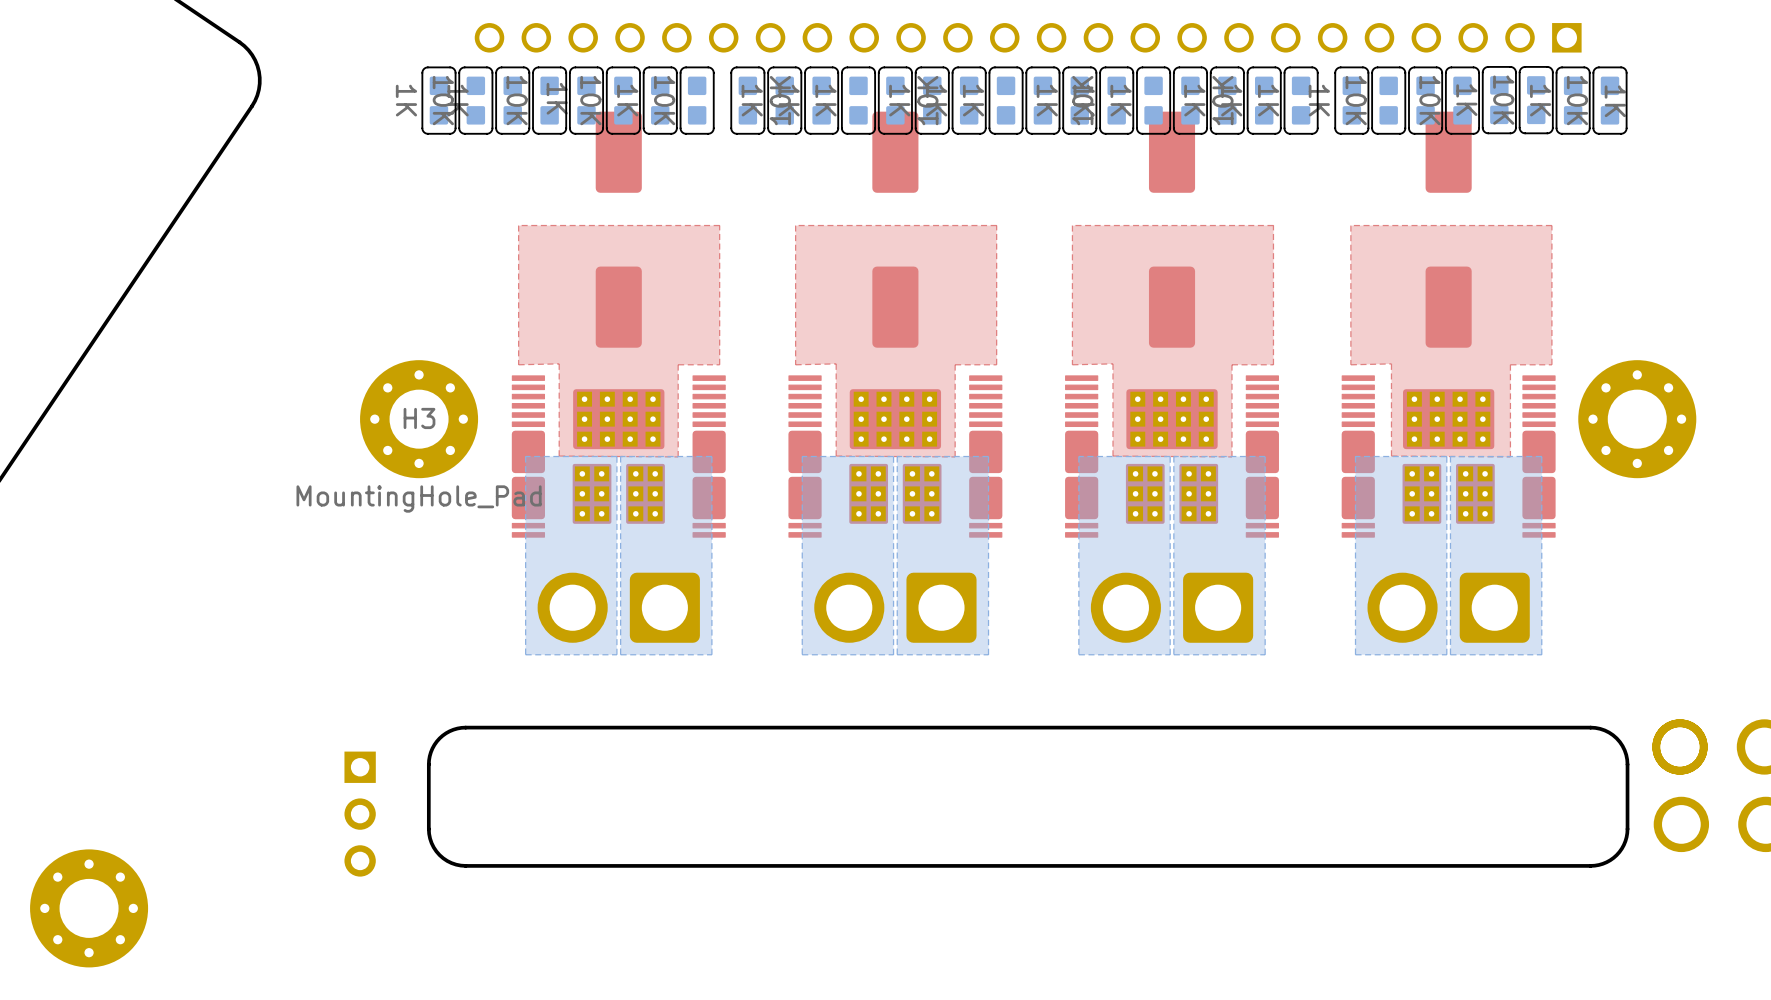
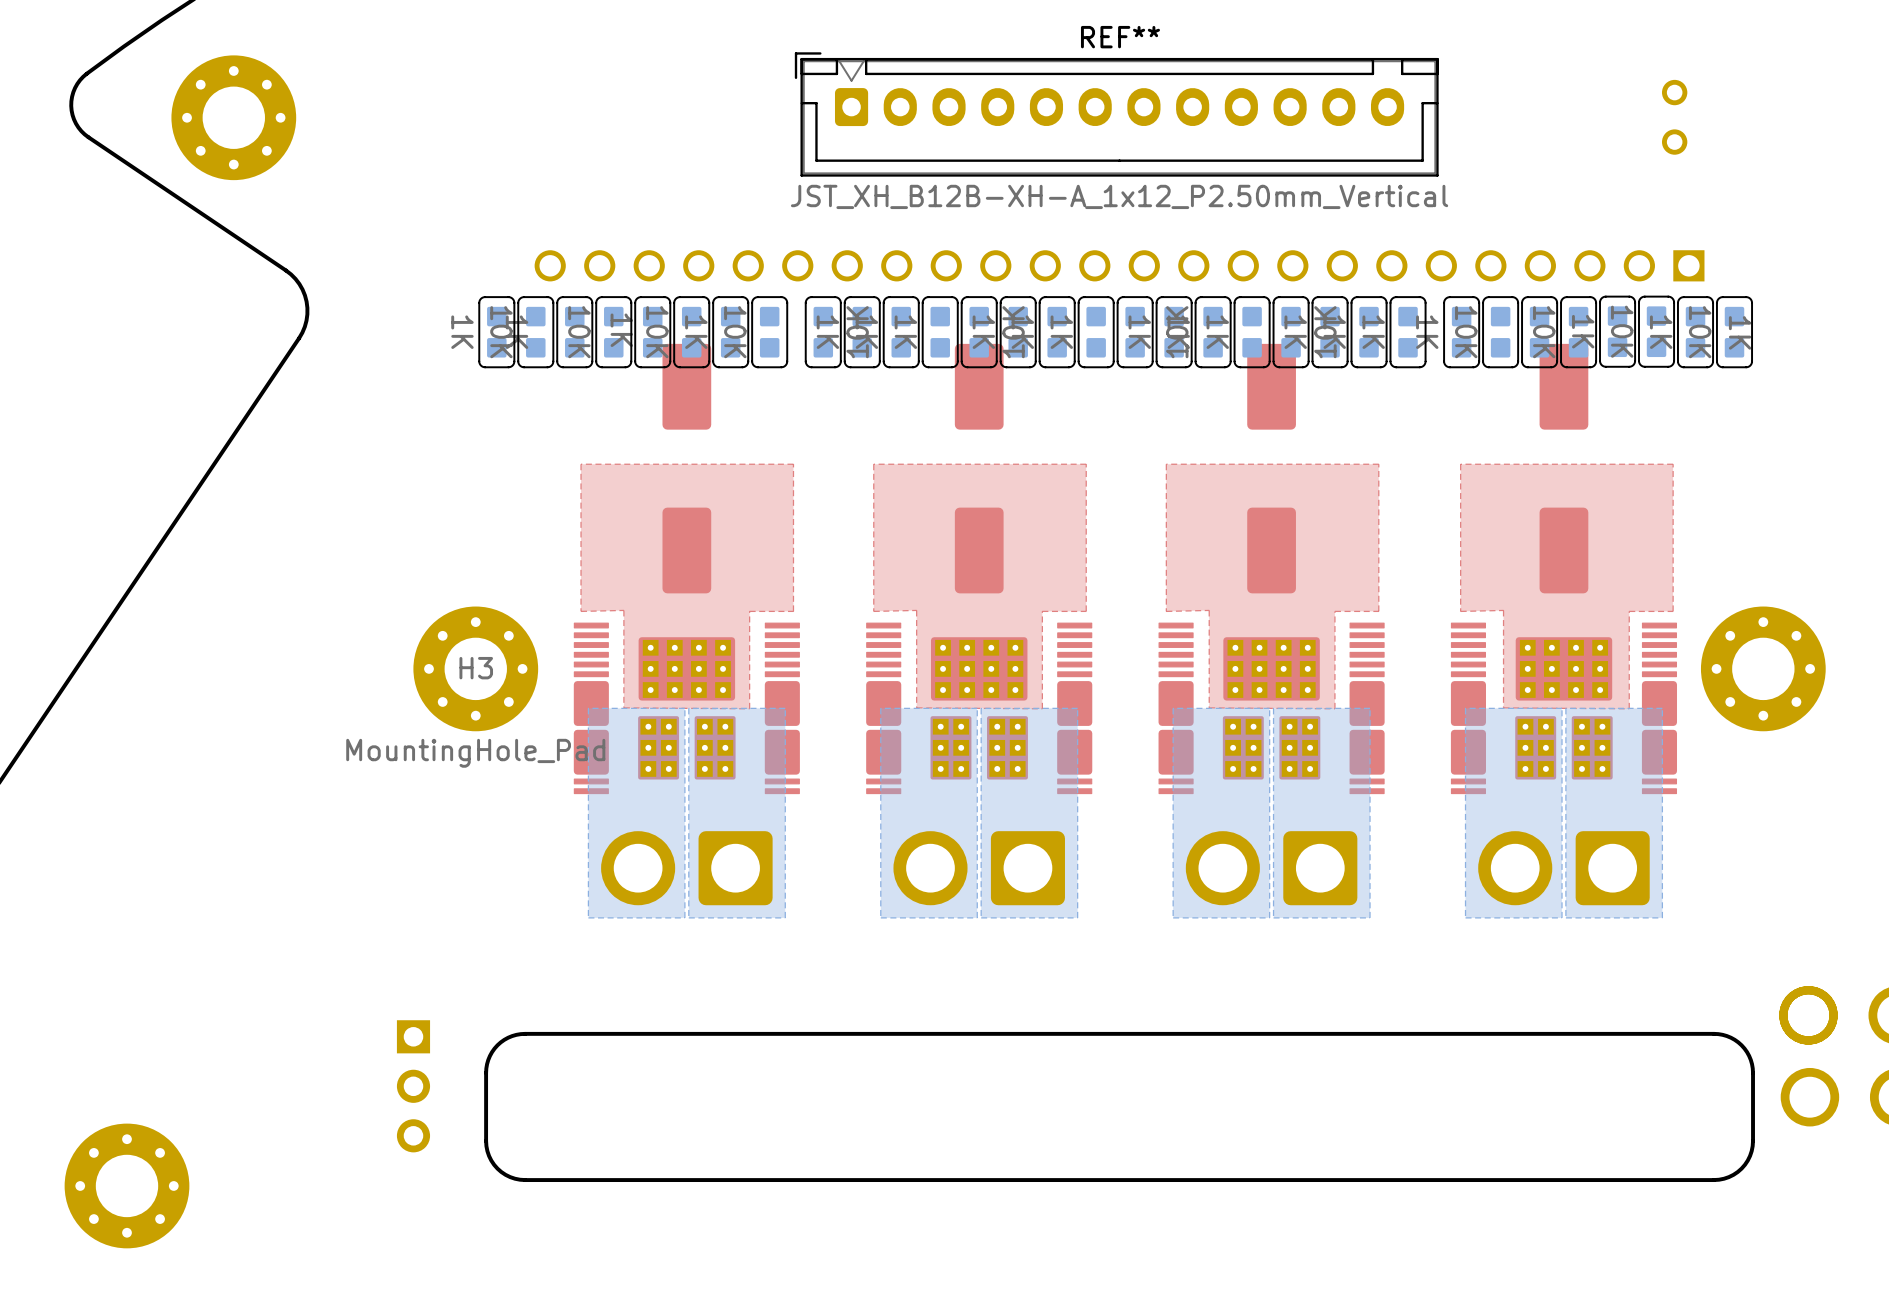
board edge: (1627, 801) (1627, 759) (1622, 746) (1609, 732) (1590, 727) (465, 727) (446, 733) (432, 748) (429, 760) (428, 801) -> (1753, 1072) (1750, 1059) (1741, 1045) (1730, 1037) (1714, 1033) (525, 1033) (508, 1037) (497, 1045) (488, 1059) (486, 1072)
board edge: (1627, 829) (1623, 845) (1616, 855) (1606, 862) (1590, 865) (465, 865) (451, 863) (439, 855) (431, 843) (428, 829) -> (1753, 1102) (1752, 1146) (1747, 1160) (1733, 1174) (1714, 1180) (525, 1180) (505, 1174) (491, 1160) (486, 1146) (486, 1102)

